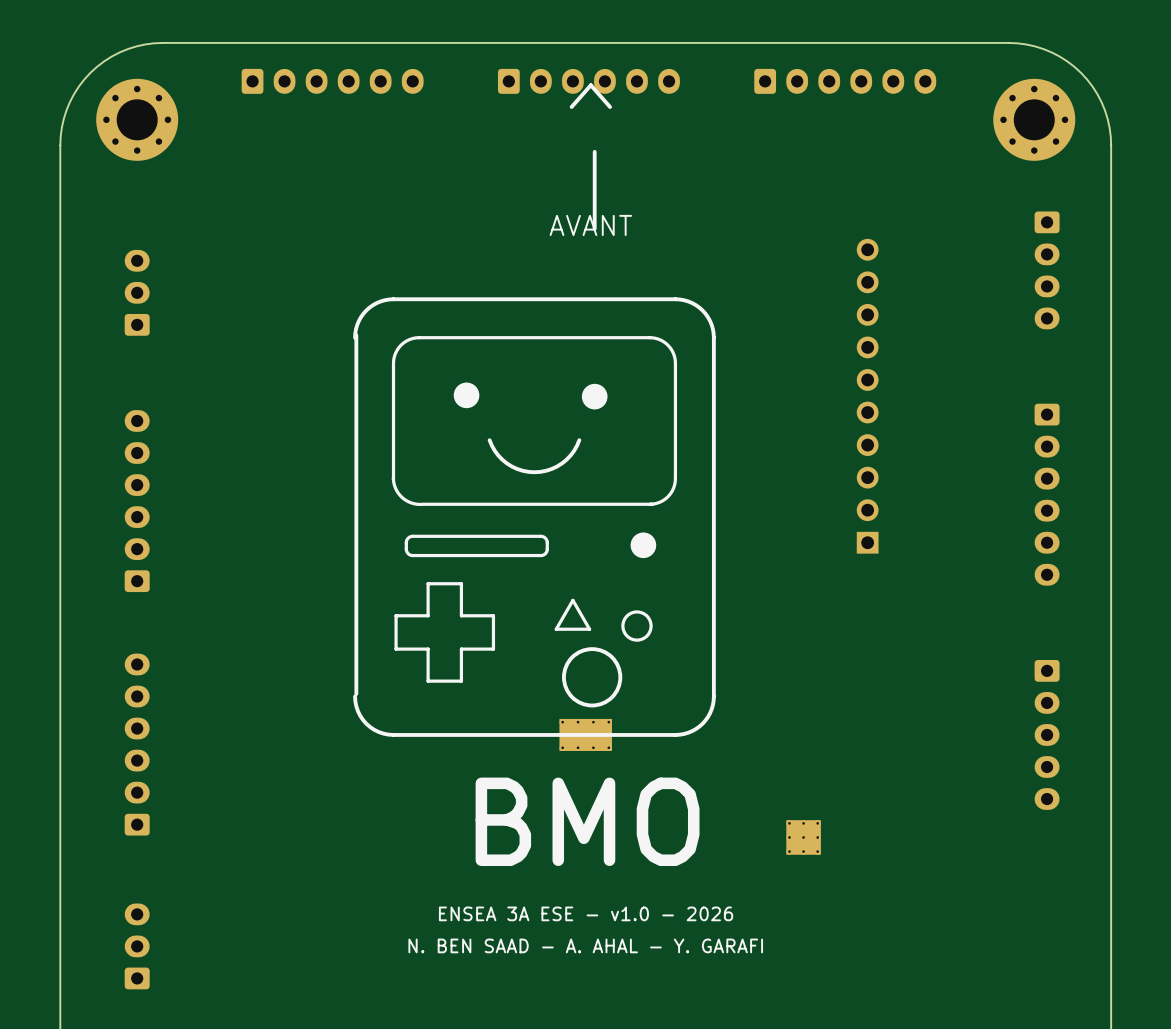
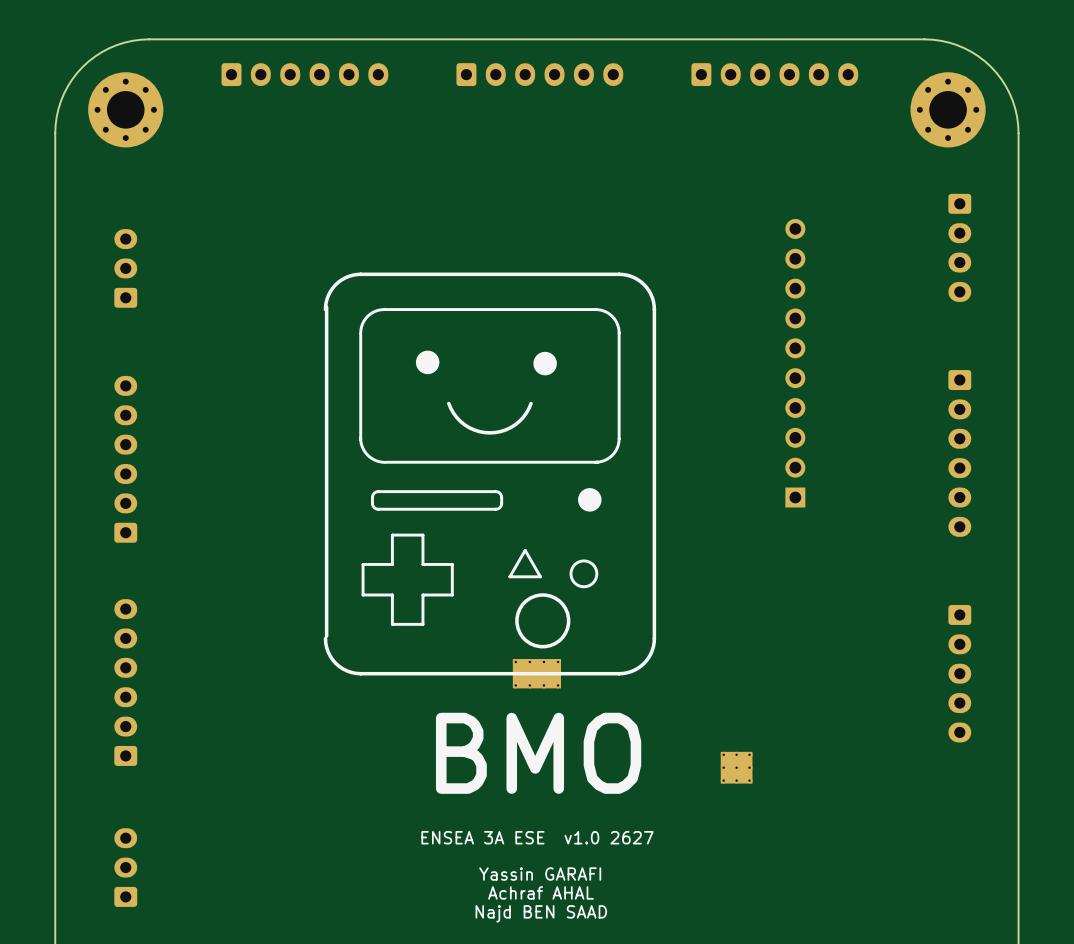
line: (610, 107) (590, 85) (571, 107) -> none
line: (594, 151) (594, 228) -> none
text: AVANT (590, 225) -> none
text: ENSEA 3A ESE - v1.0 - 2026 (586, 913) -> ENSEA 3A ESE v1.0 2627 (537, 837)
text: N. BEN SAAD - A. AHAL - Y. GARAFI (585, 945) -> Yassin GARAFI (540, 874)
text: none -> Achraf AHAL (541, 892)
text: none -> Najd BEN SAAD (541, 913)

